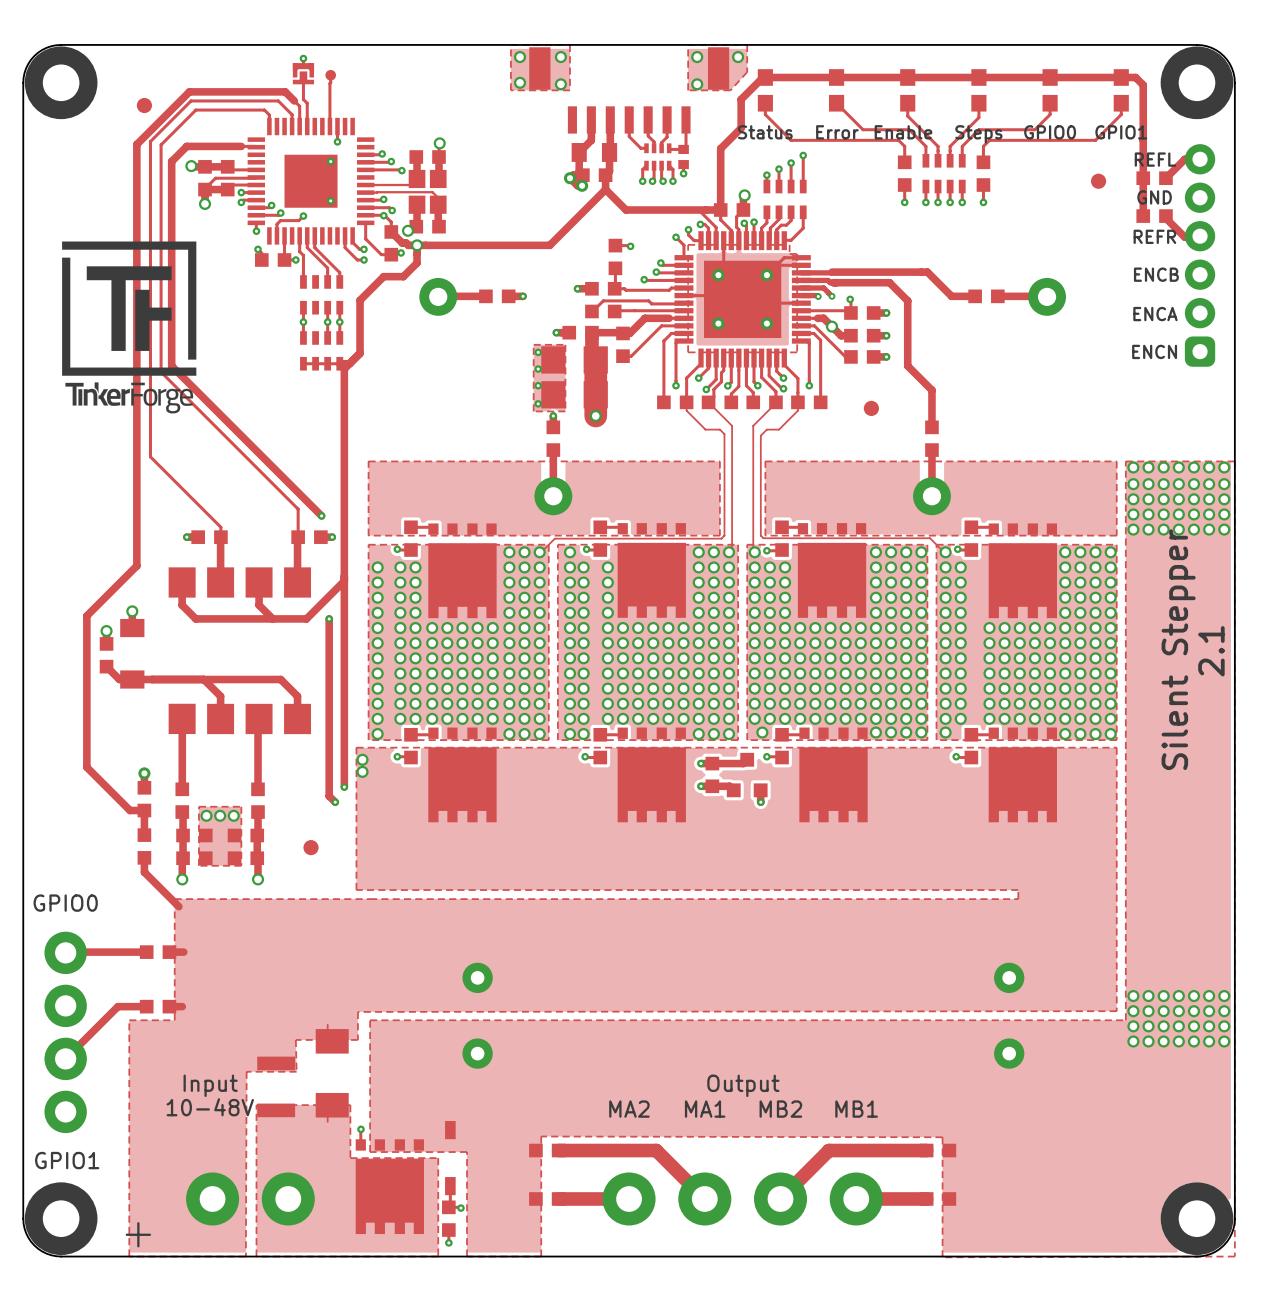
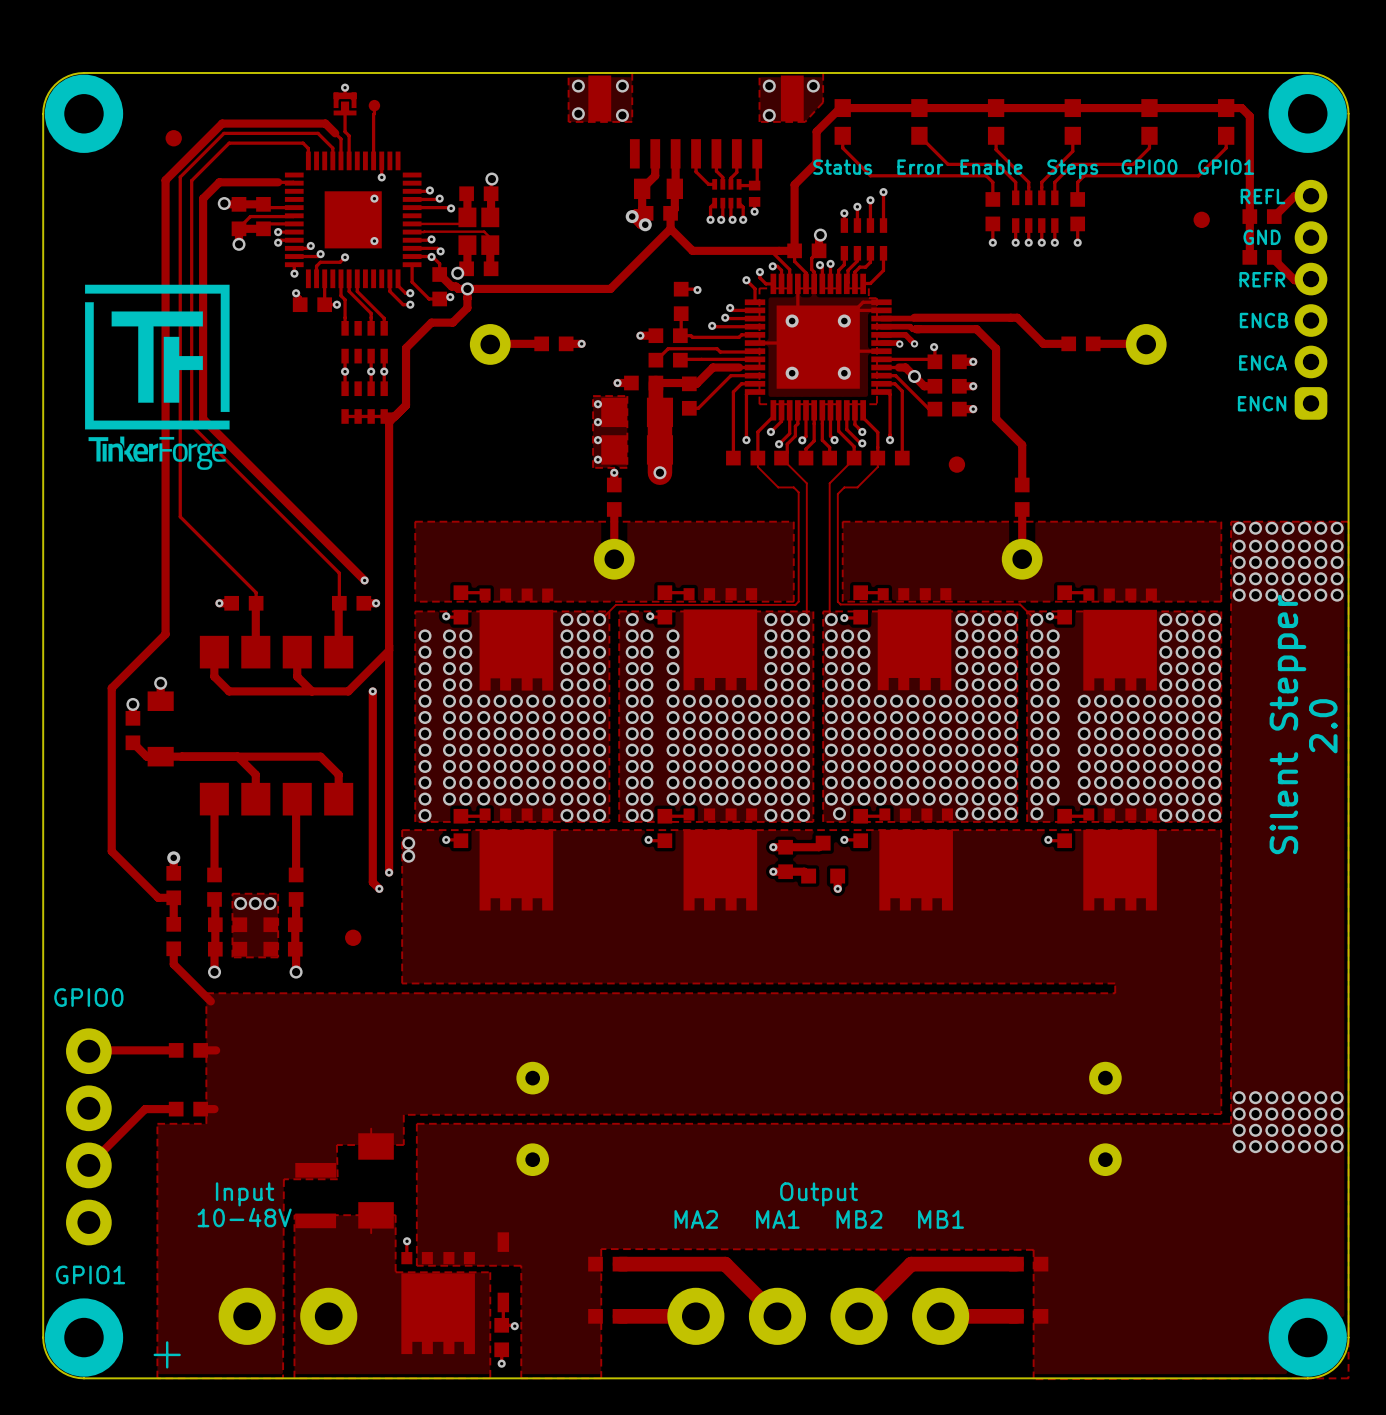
text: 2.1 (1211, 651) -> 2.0 (1323, 726)

